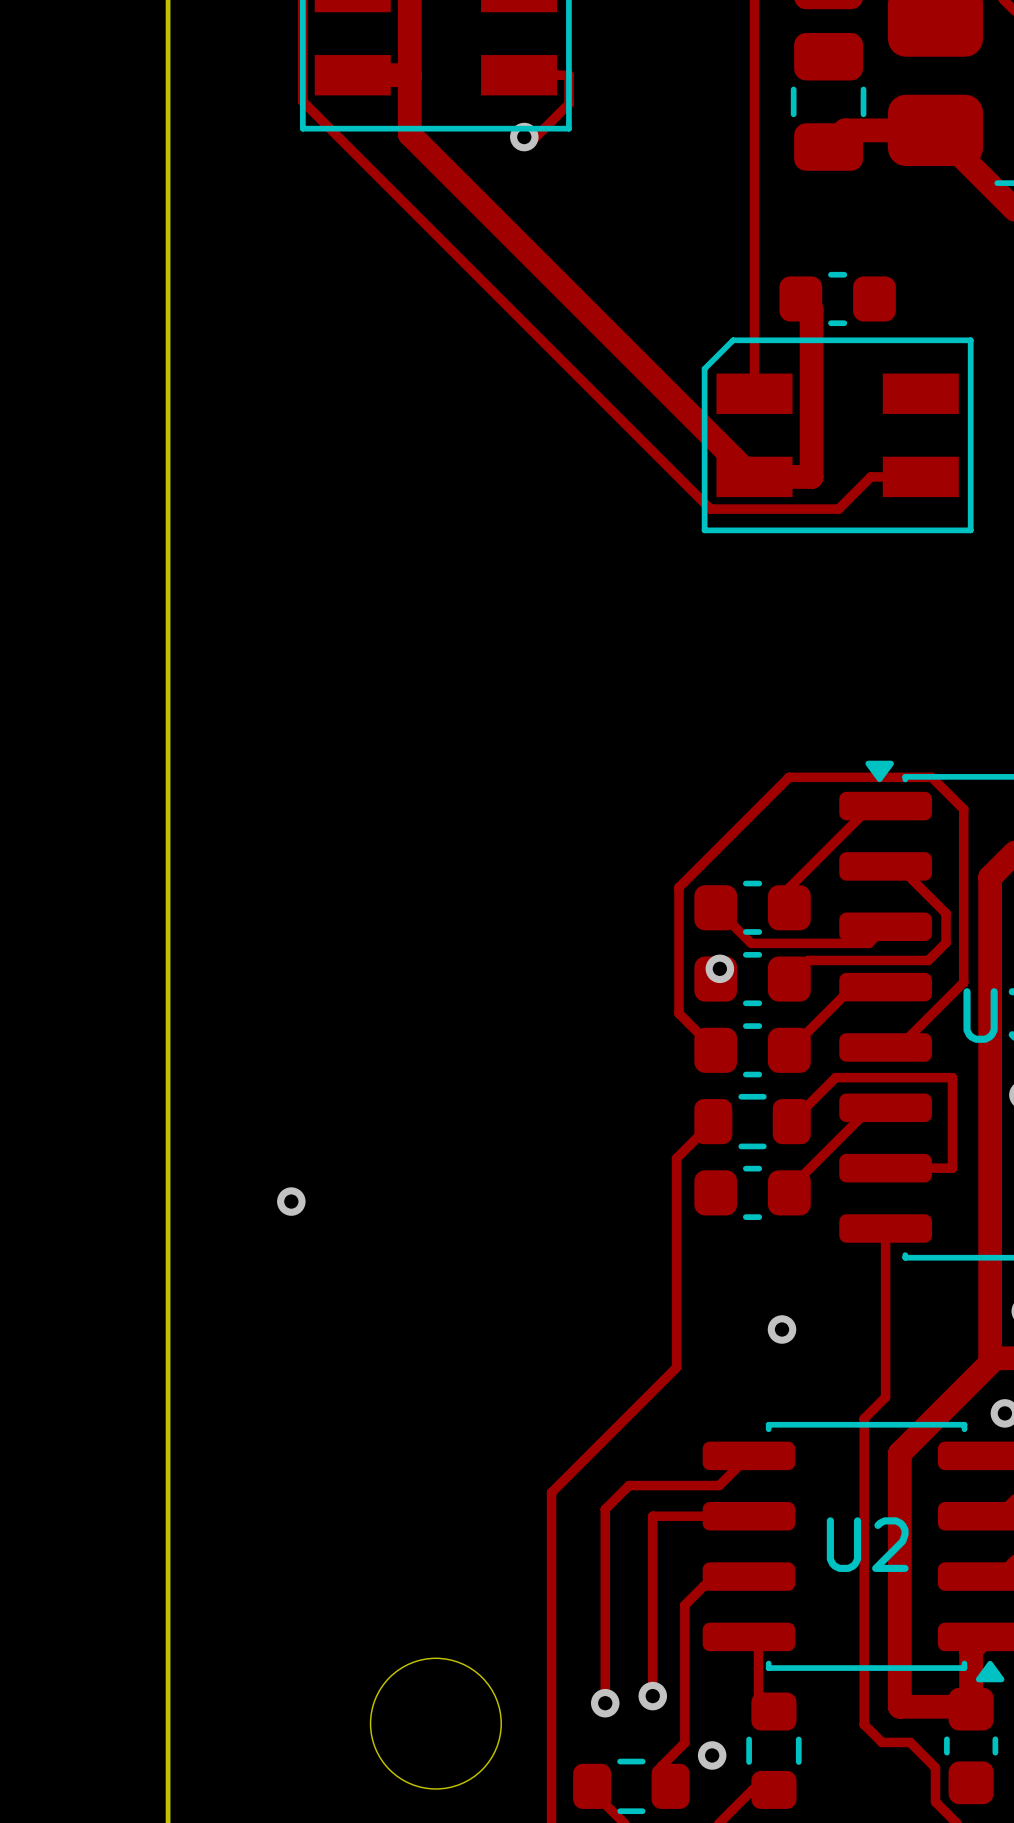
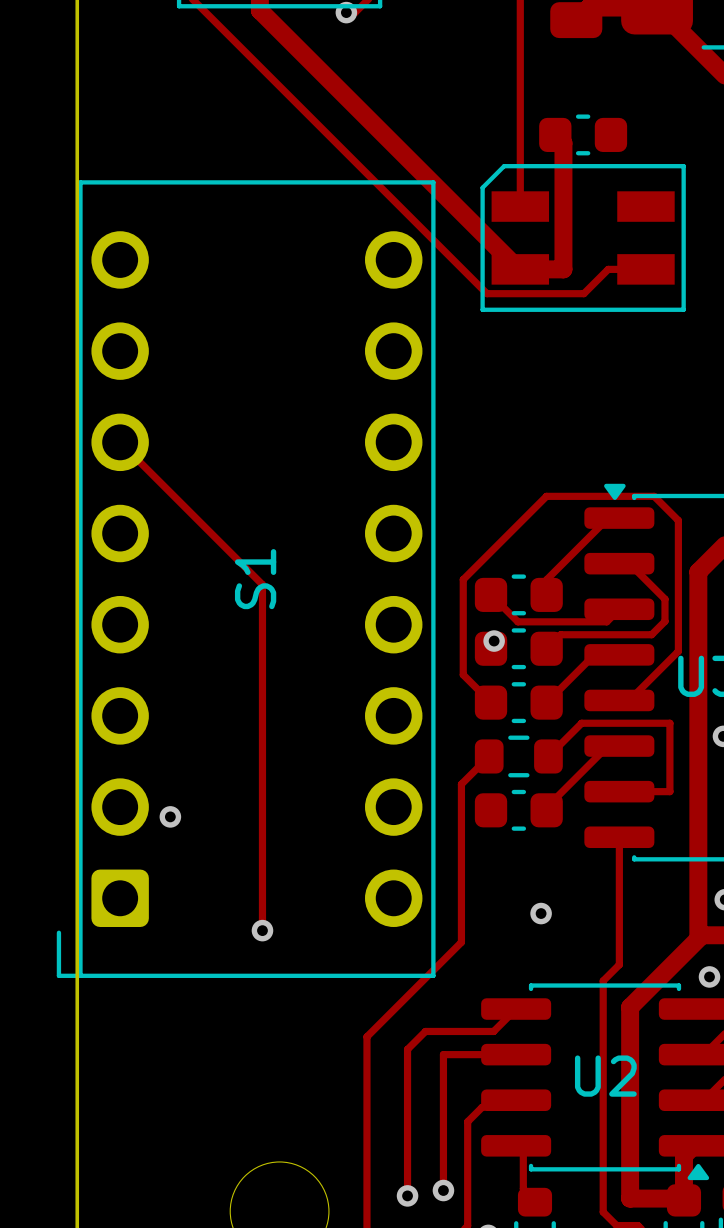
track: none -> (120, 442) (262, 584) (262, 930)
S1: none -> (246, 579)
via: none -> (262, 930)

